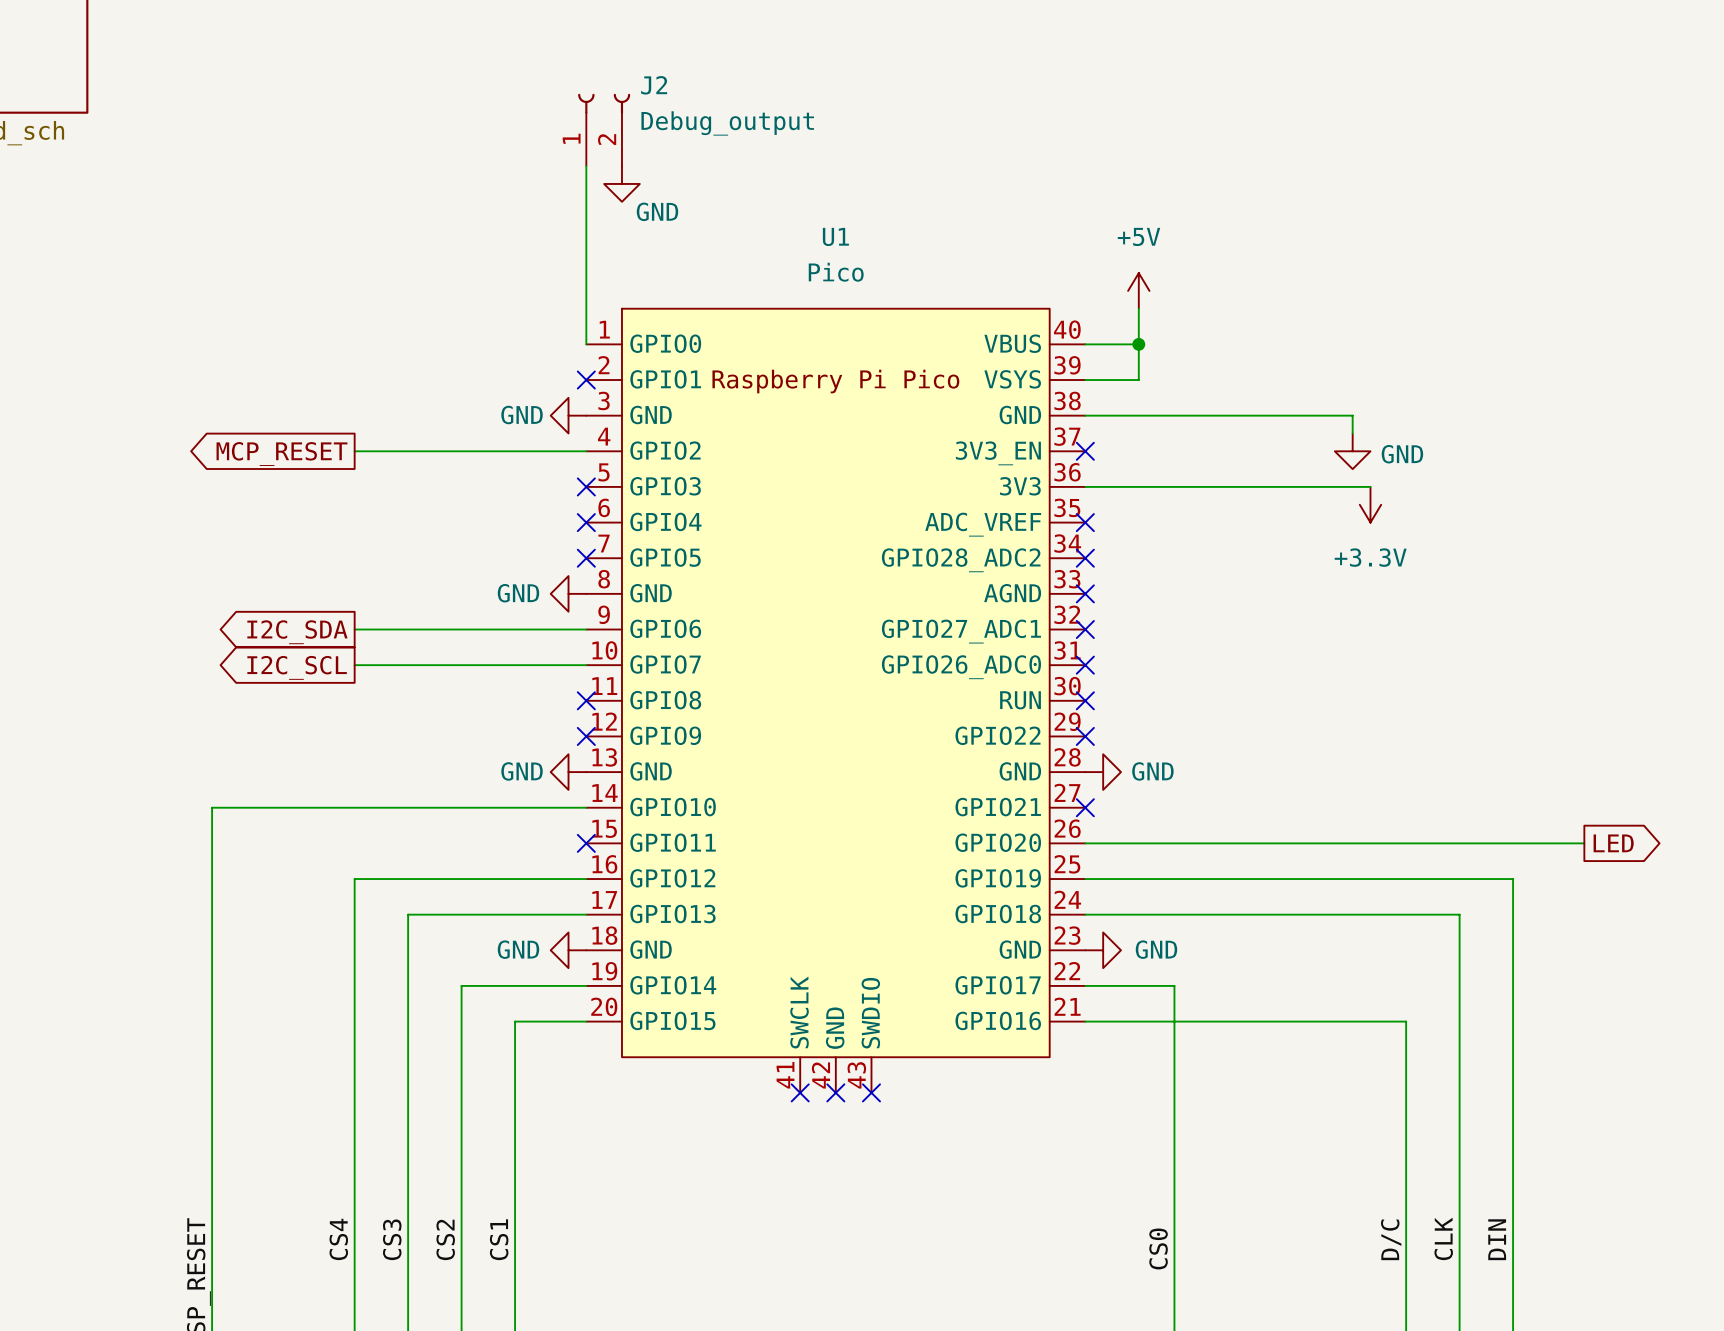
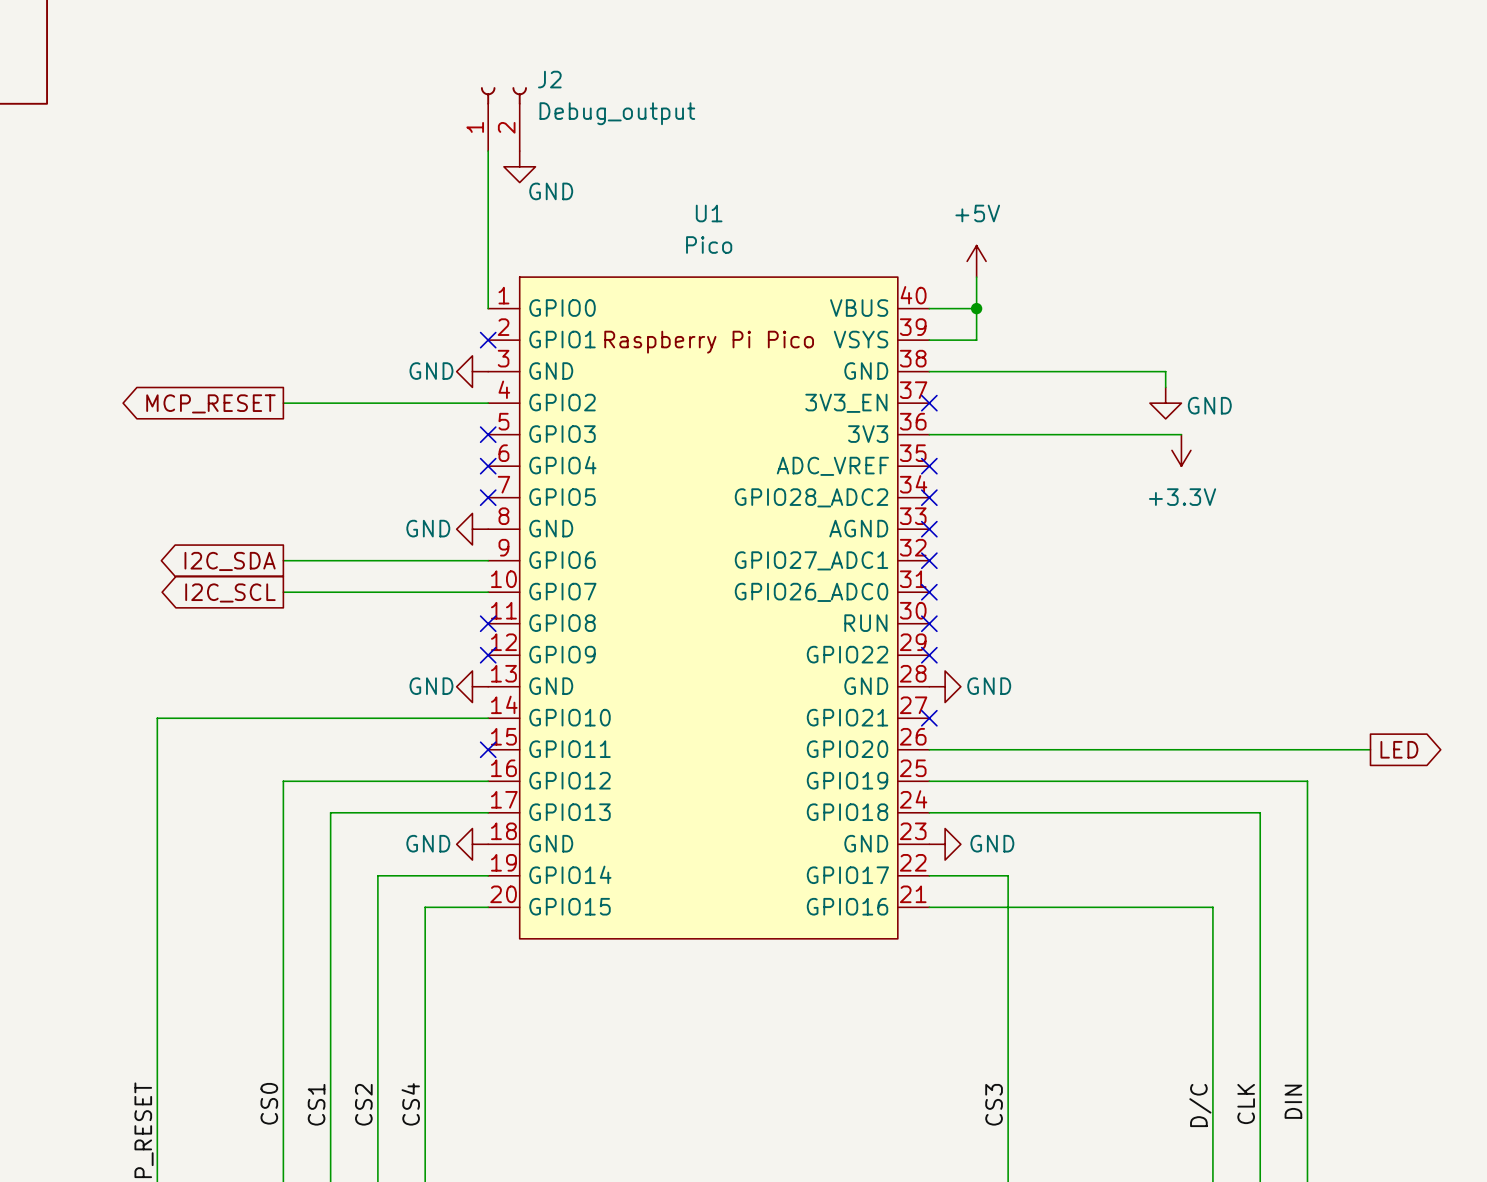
U1 symbol: [586, 308, 1086, 1093] -> [488, 277, 930, 939]
no-connect mark: (800, 1092) -> none
no-connect mark: (835, 1092) -> none
no-connect mark: (871, 1092) -> none
label: CS4 (338, 1239) -> CS0 (269, 1103)
label: CS3 (392, 1239) -> CS1 (316, 1104)
label: CS1 (499, 1239) -> CS4 (410, 1104)
label: CS0 (1158, 1248) -> CS3 (994, 1104)

